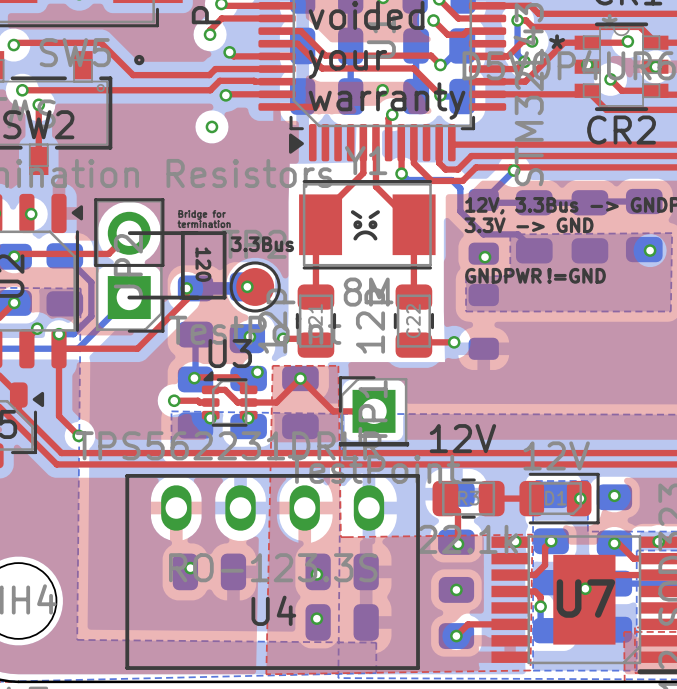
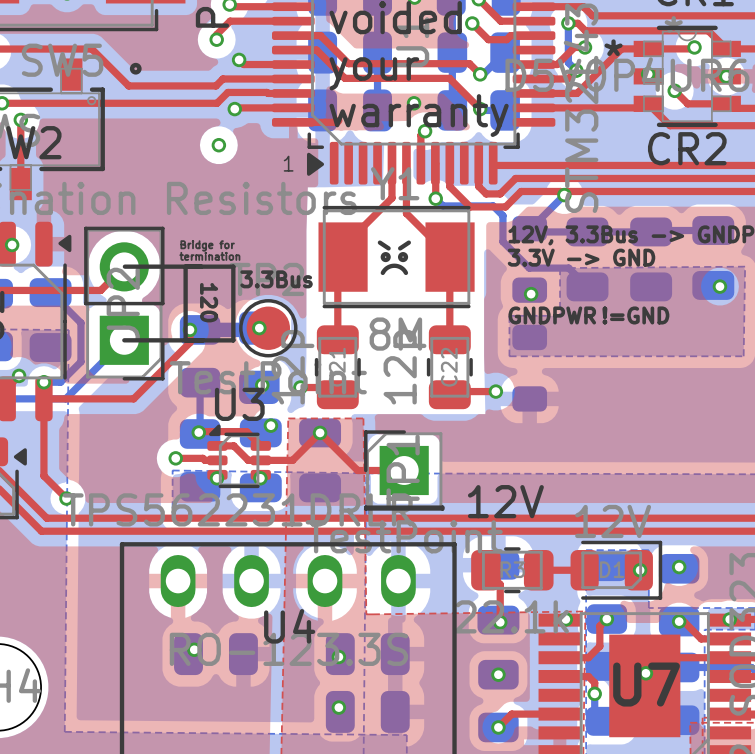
text: none -> 1 (288, 163)
U4 name position: U4 (273, 610) -> U4 (289, 626)

